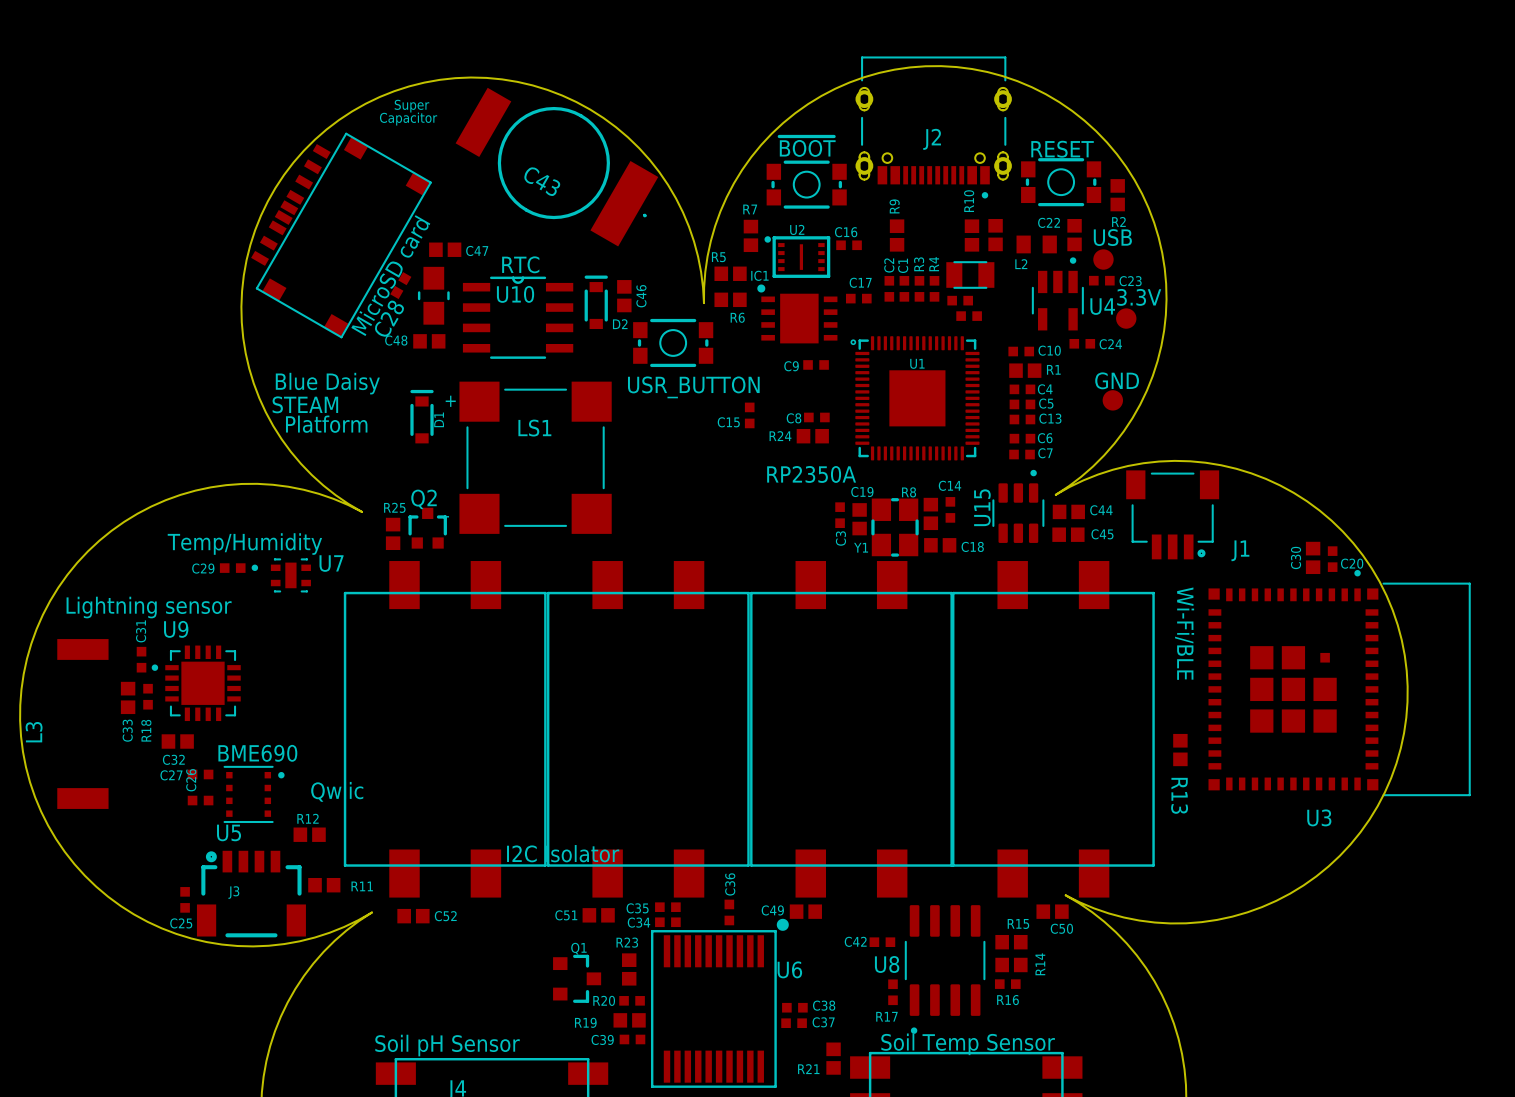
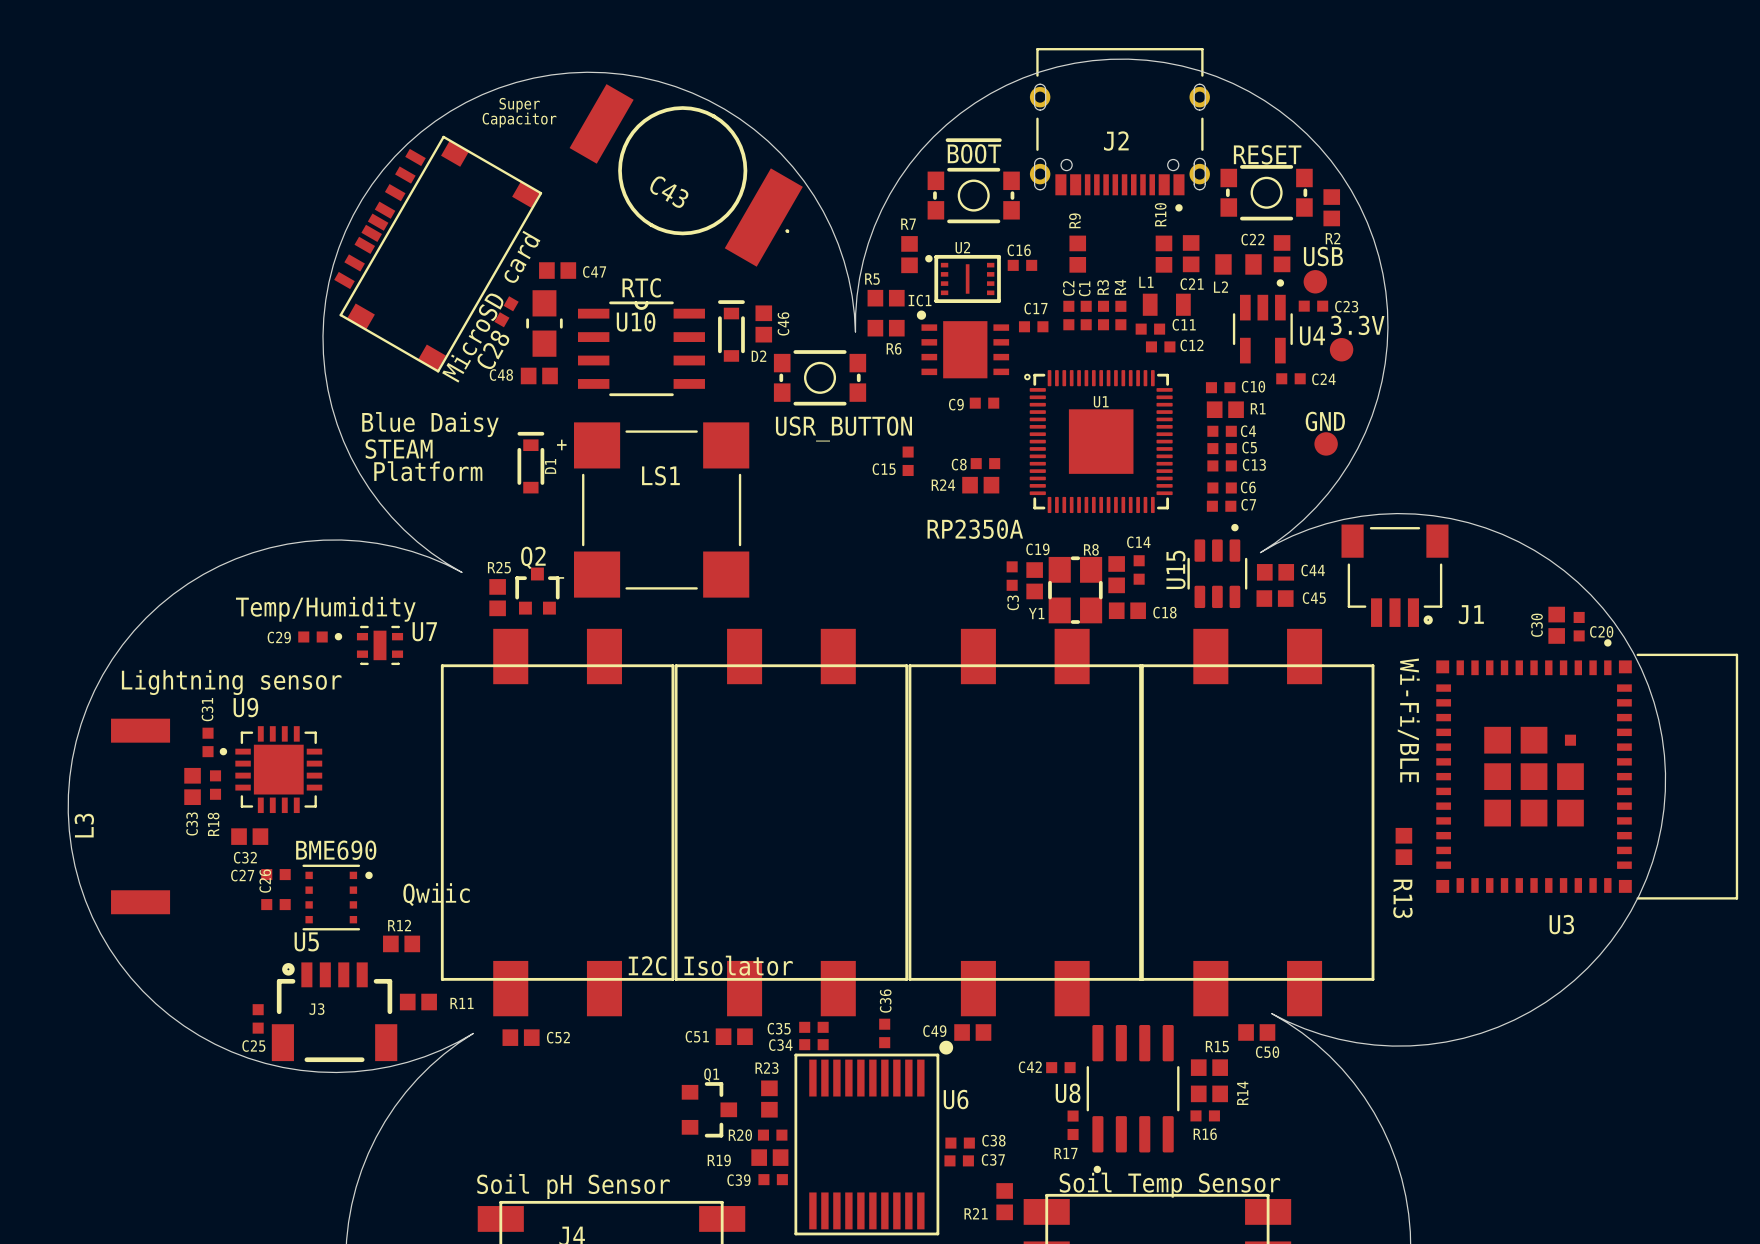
C21 name: none -> C21 (1192, 284)
part: (970, 274) -> none
L1: none -> (1166, 304)
C11 name: none -> C11 (1184, 324)
C12 name: none -> C12 (1191, 345)

